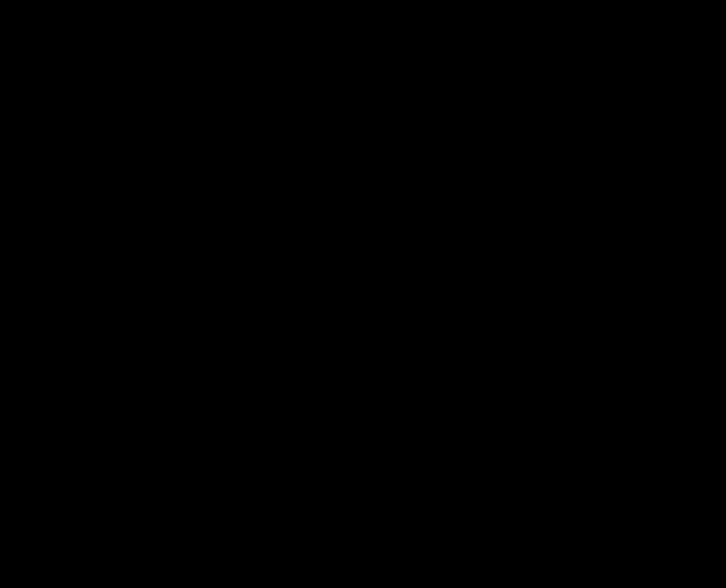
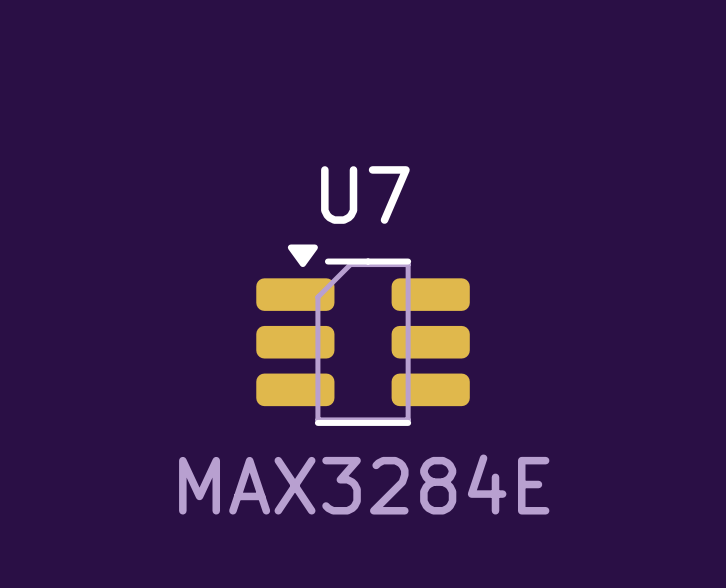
U7: none -> MAX3284E (363, 335)

